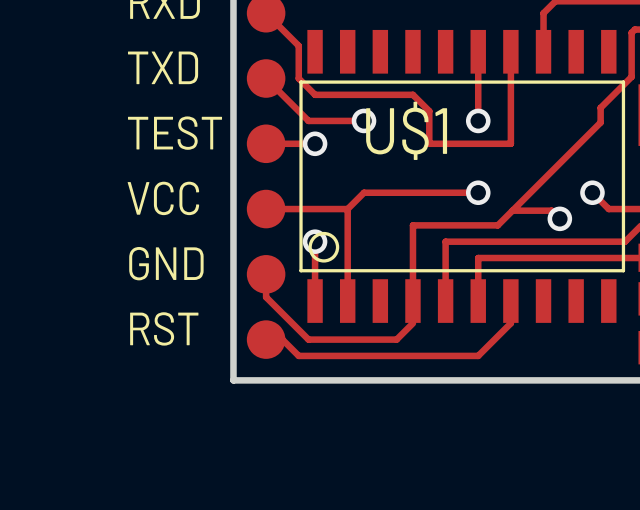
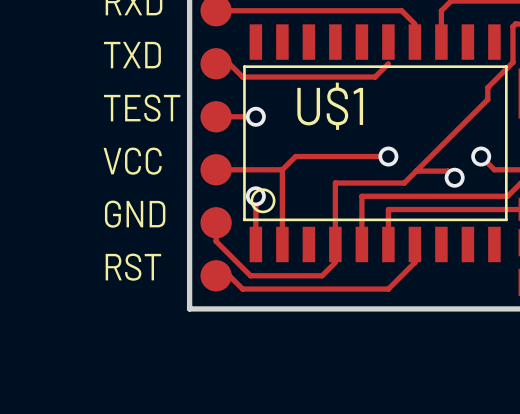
track: (266, 13) (298, 45) (298, 78) (315, 94) -> (216, 10) (401, 10) (414, 24)
track: (478, 51) (478, 120) -> none
track: (510, 51) (510, 143) (429, 143) (429, 111) (412, 94) -> (388, 63) (375, 77) (335, 77)
track: (266, 78) (308, 120) (364, 120) -> (216, 63) (229, 63) (242, 77) (255, 77)
via: (364, 120) -> none
via: (478, 120) -> none

